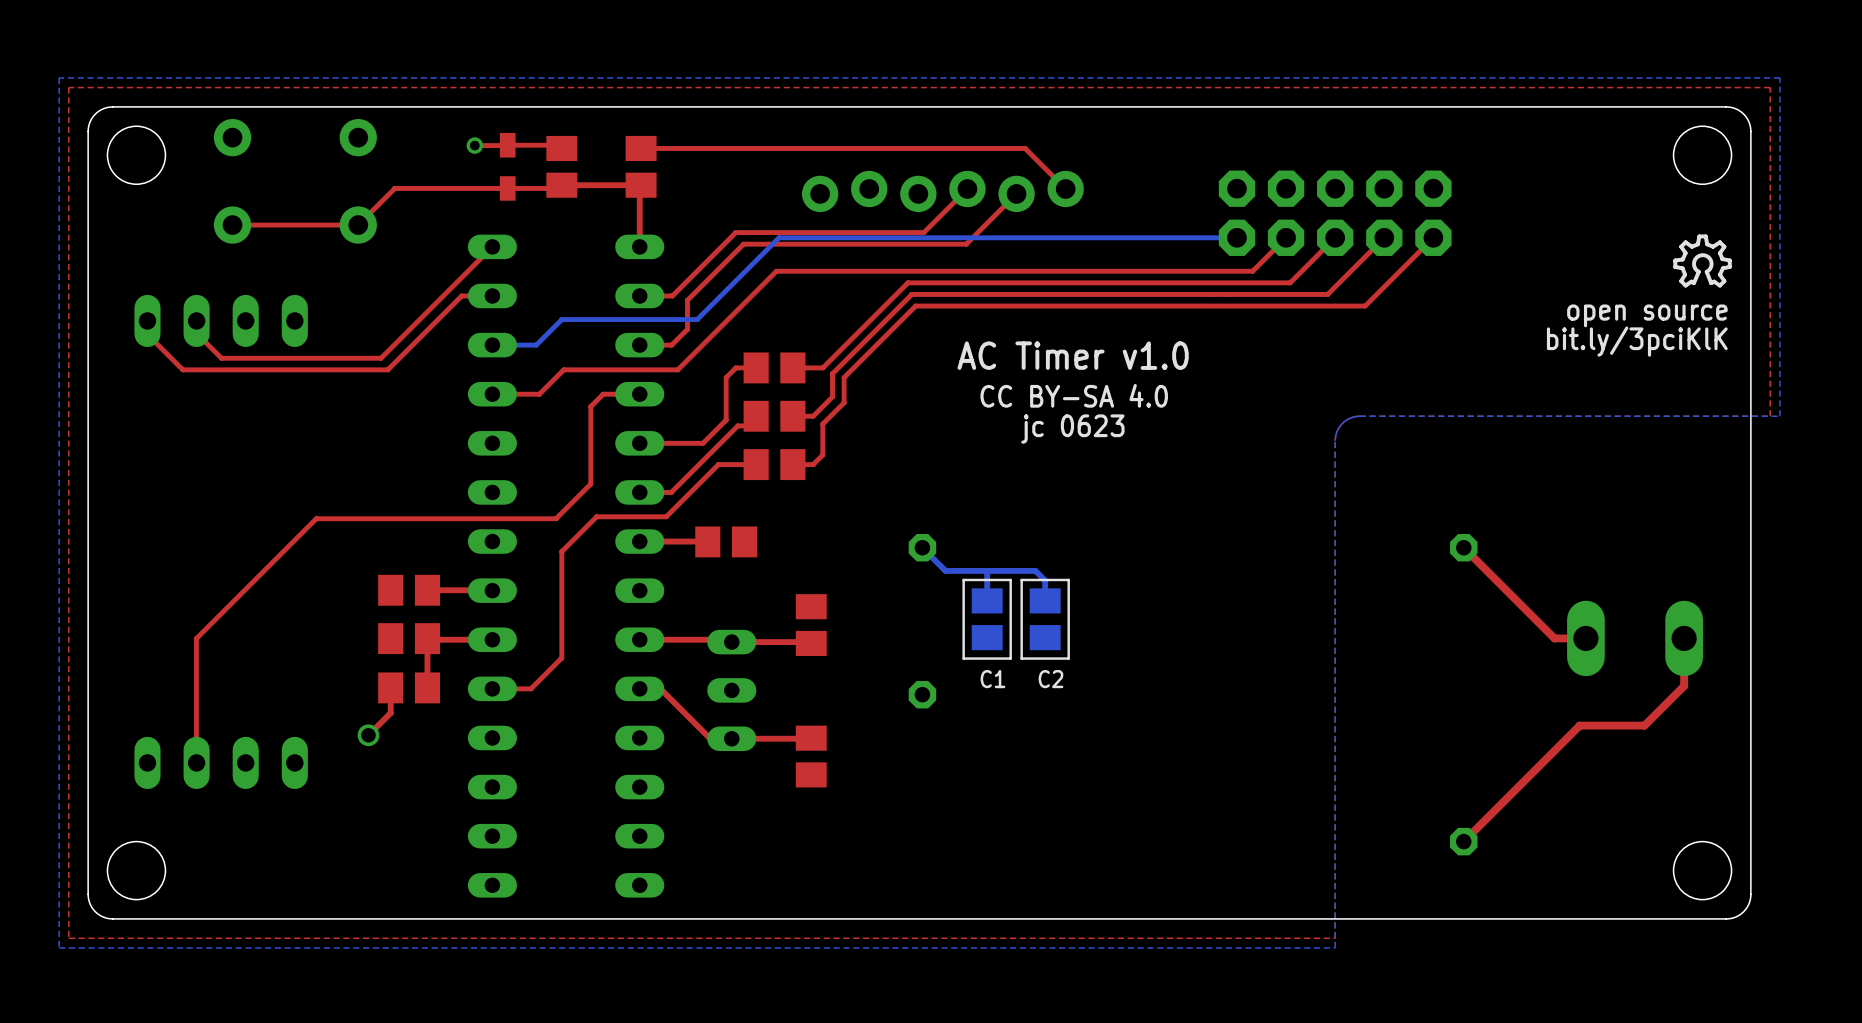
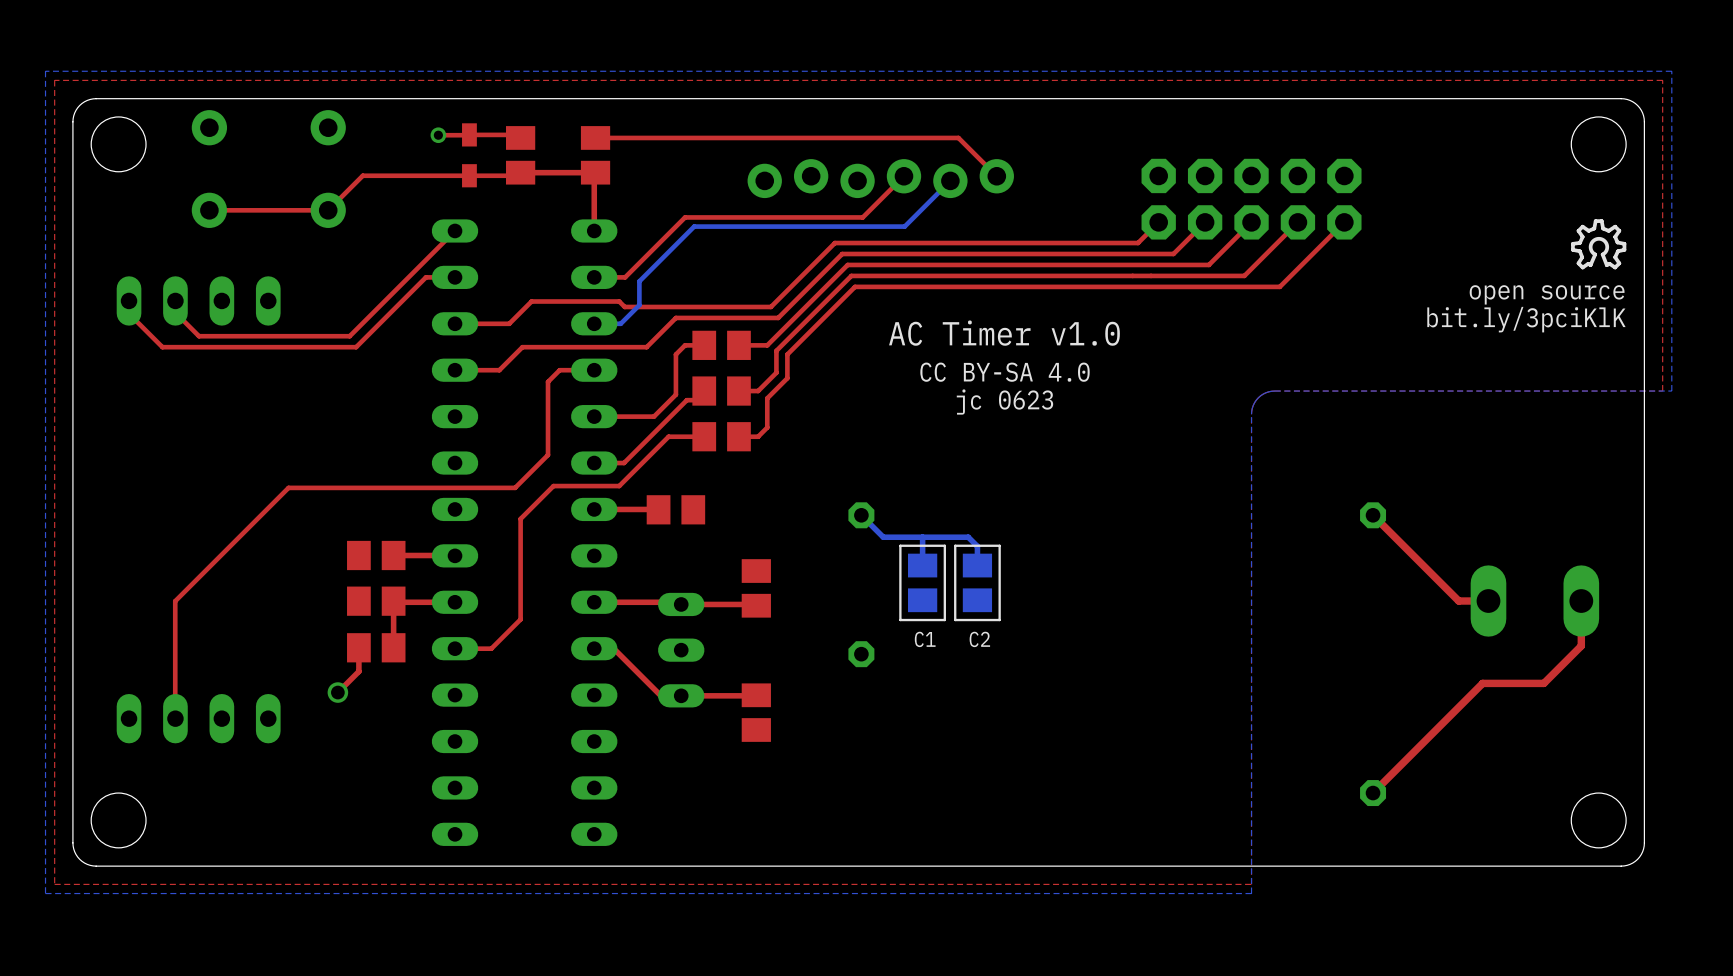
bottom track: none -> (950, 180) (904, 226) (694, 226) (639, 281) (639, 305) (620, 323) (594, 323)
top track: (1016, 193) (966, 244) (743, 244) (687, 300) (687, 329) (671, 345) (639, 345) -> none
bottom track: (1236, 237) (778, 237) (697, 319) (561, 319) (536, 345) (492, 345) -> none
top track: none -> (1158, 222) (1138, 243) (834, 243) (770, 306) (624, 306) (619, 301) (531, 301) (509, 323) (455, 323)
top track: (902, 271) (776, 271) (677, 369) -> (842, 253) (778, 317) (675, 317) (646, 347) (630, 347)

